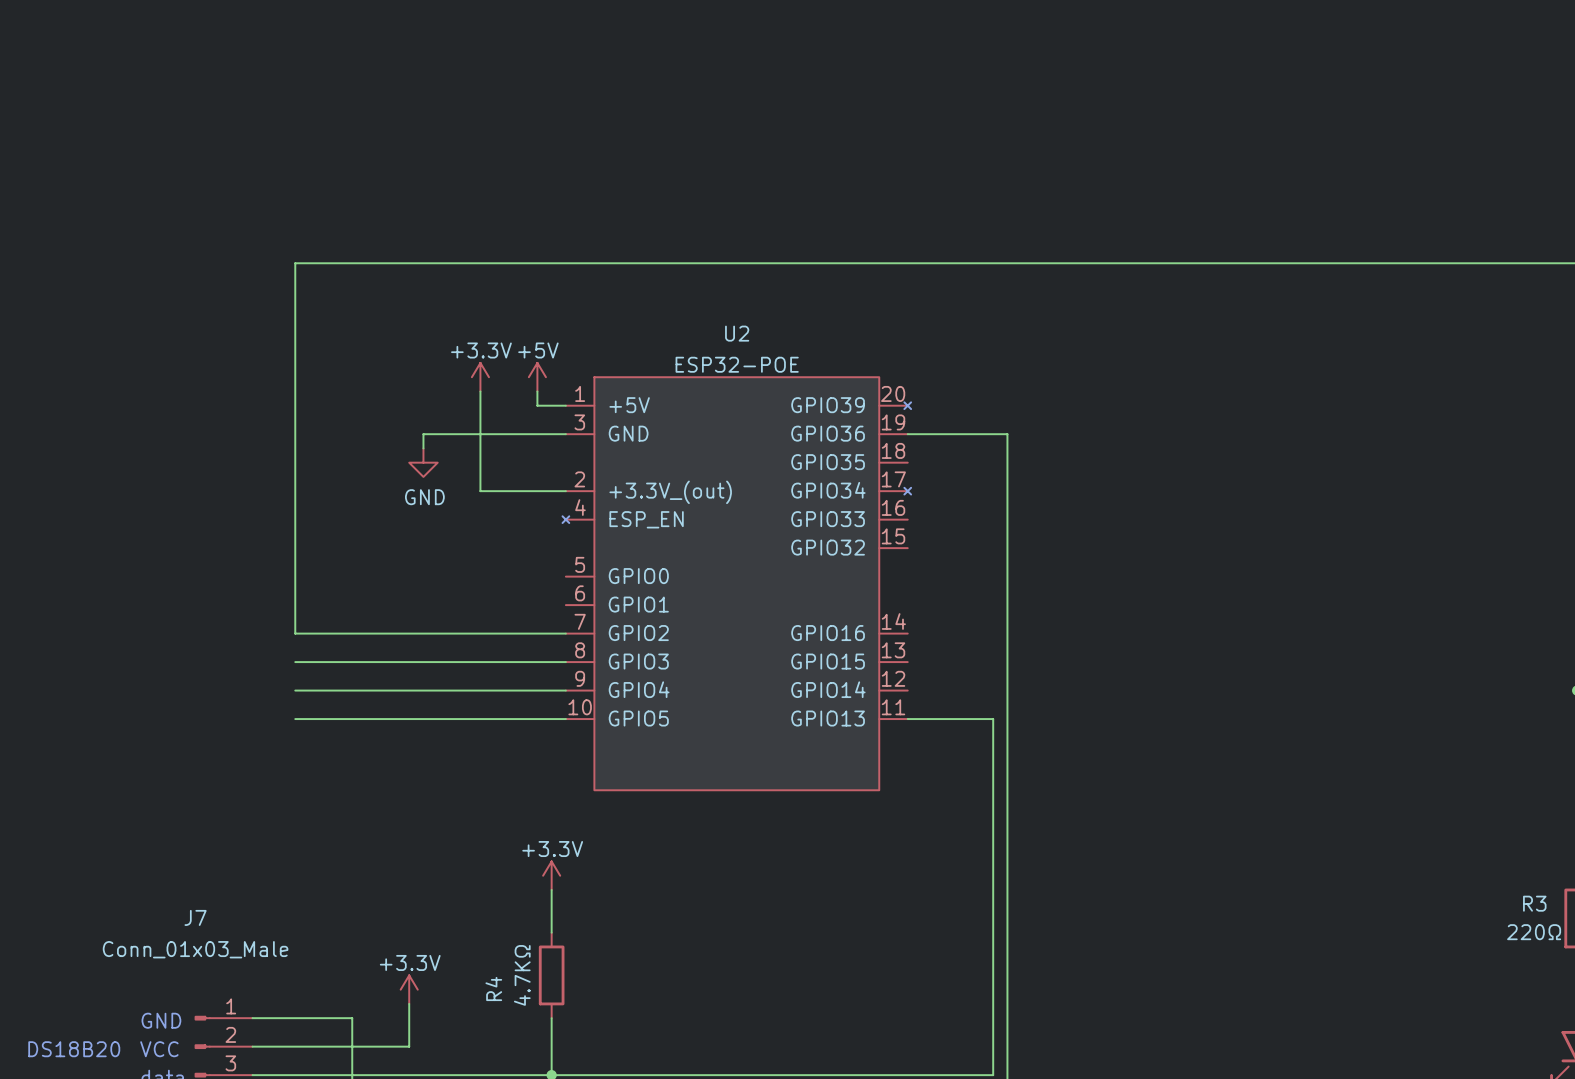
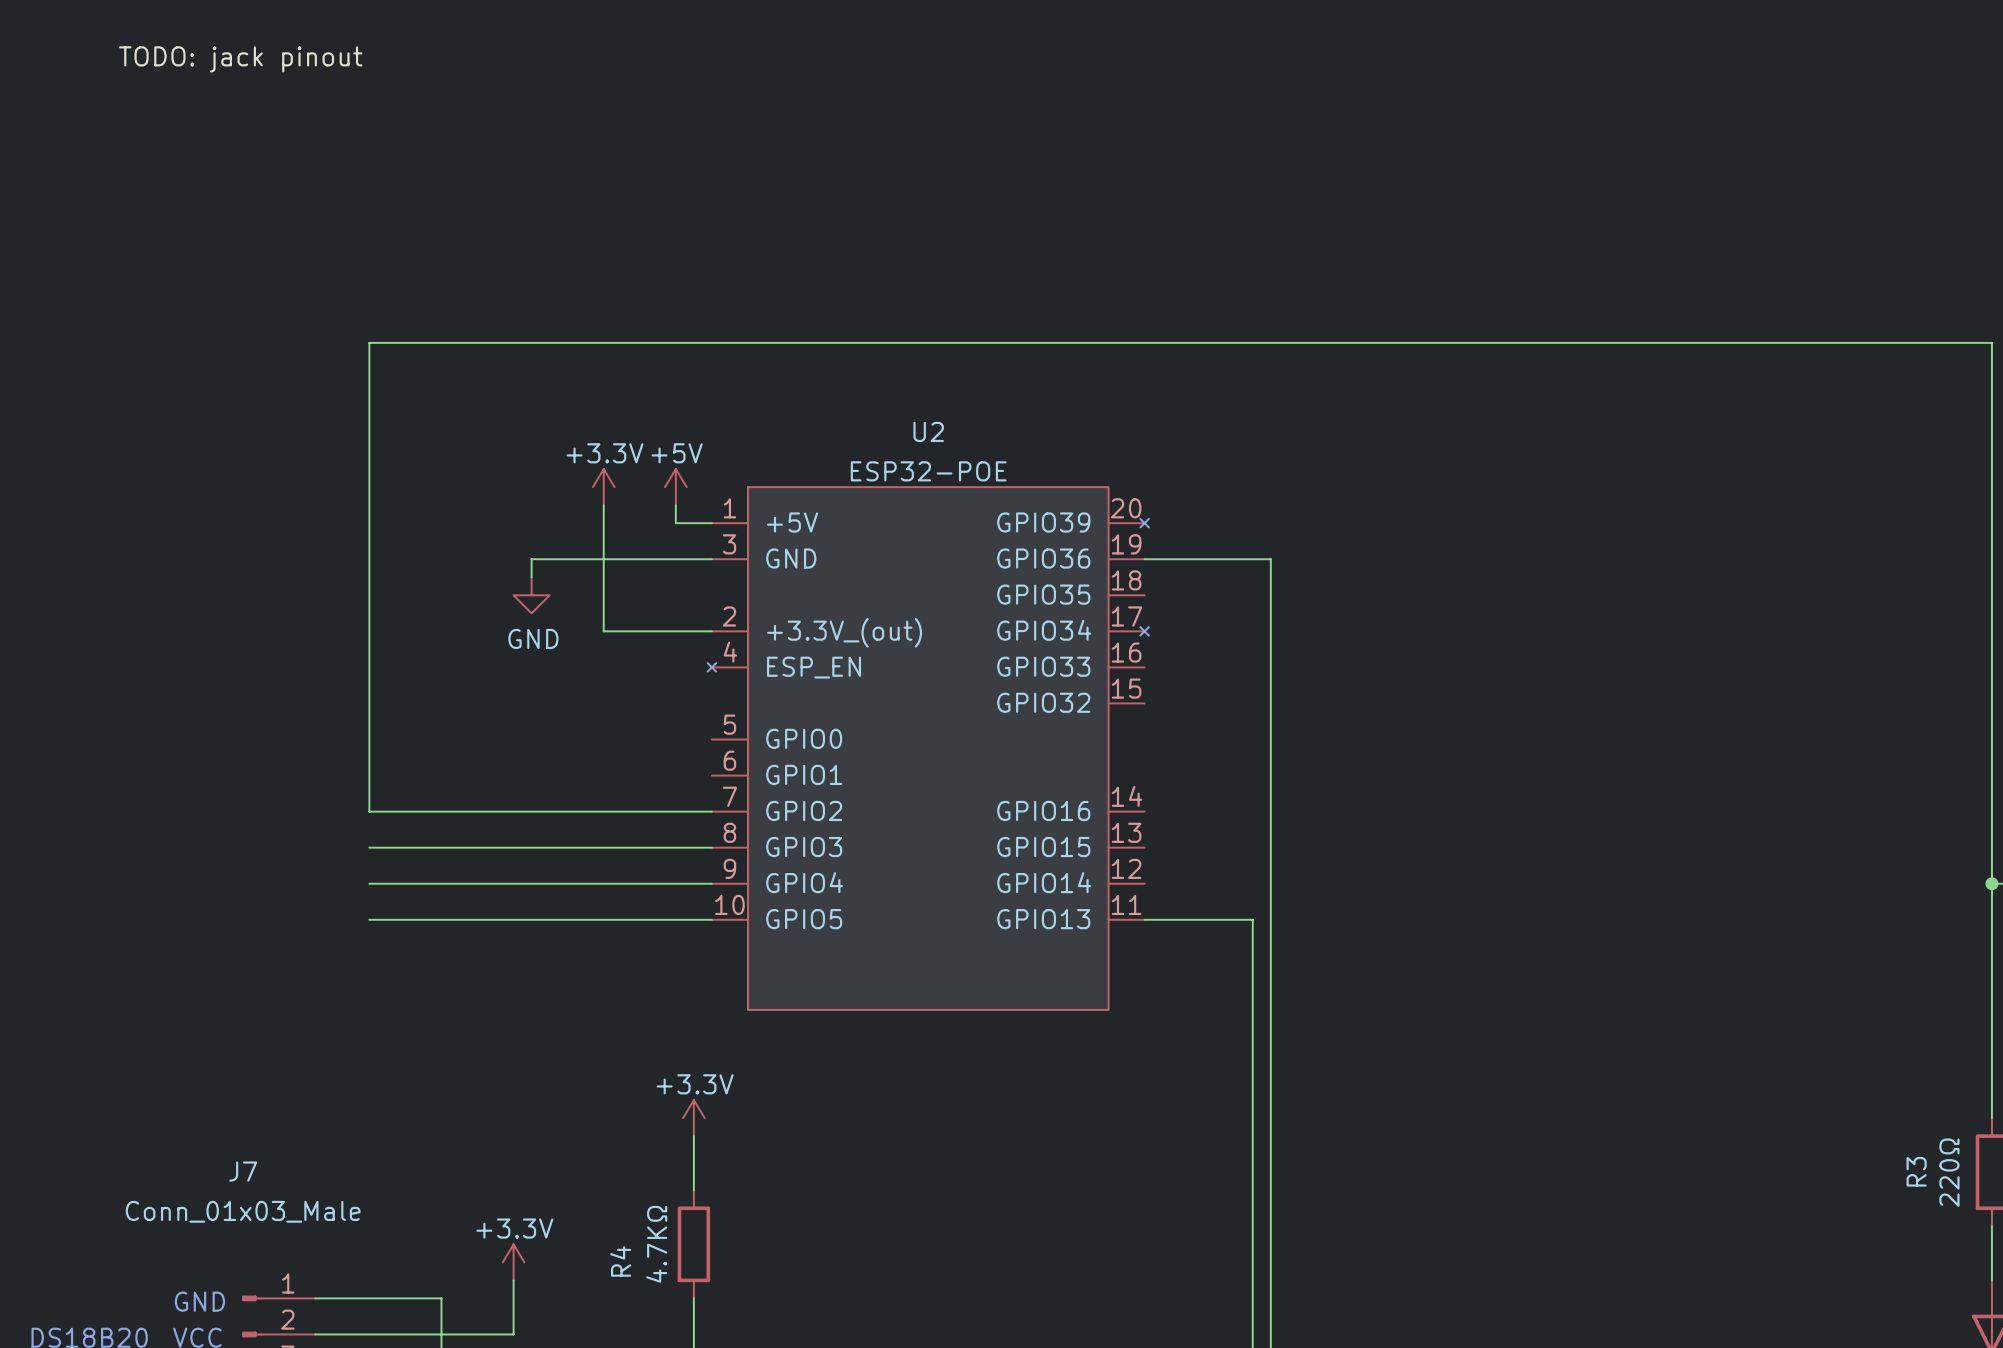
label: none -> TODO: jack pinout (240, 59)
R3 name rotation: 0° (1534, 903) -> 90° counterclockwise (1916, 1171)
R3 value rotation: 0° (1534, 932) -> 90° counterclockwise (1949, 1172)

